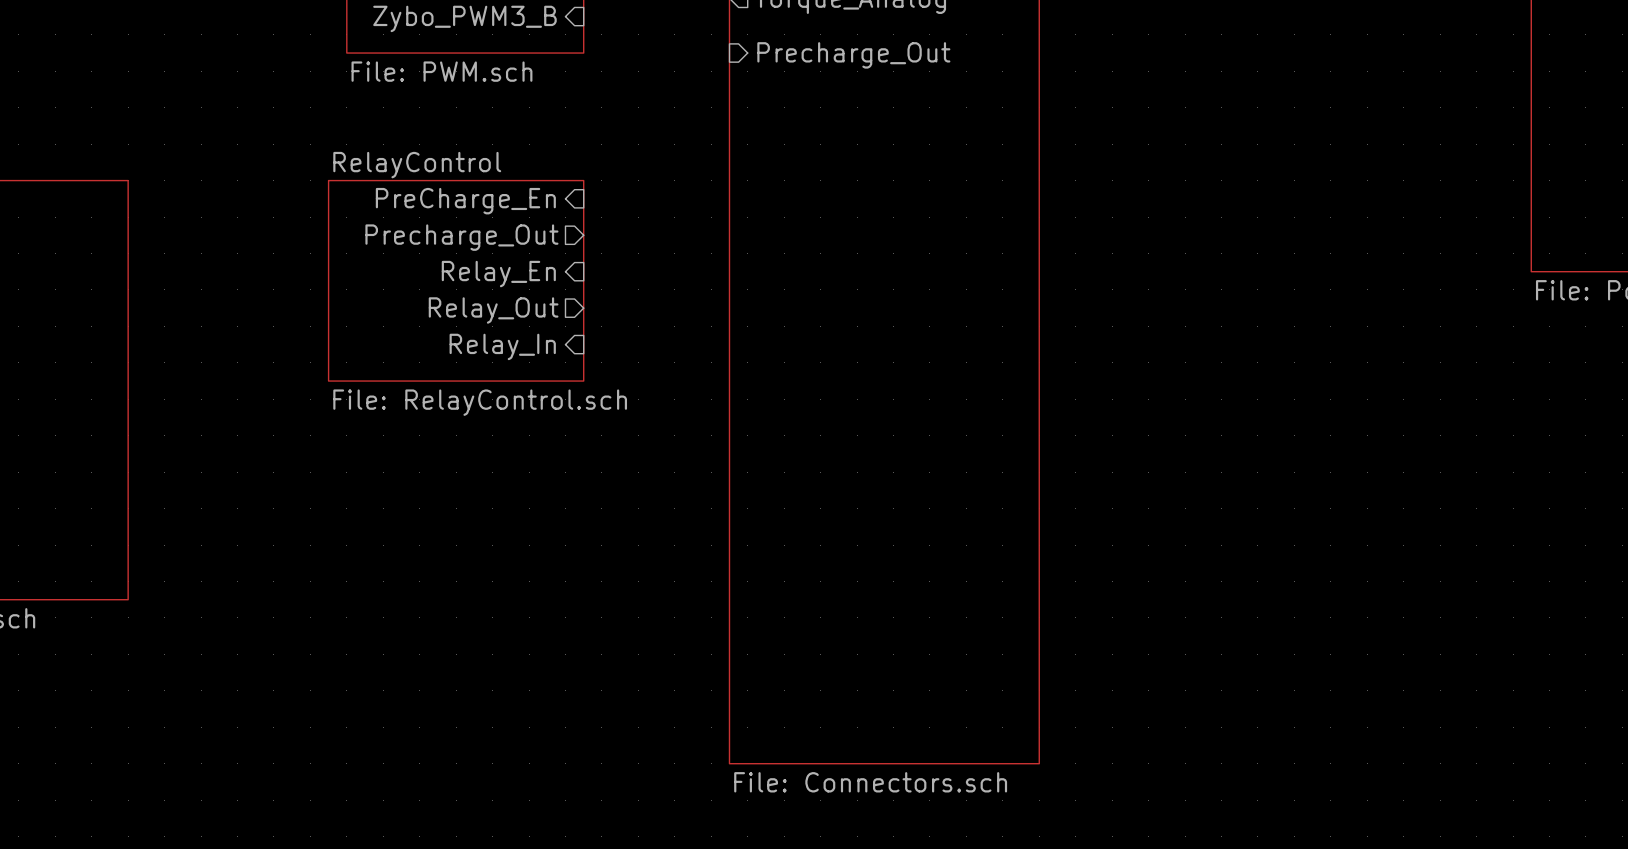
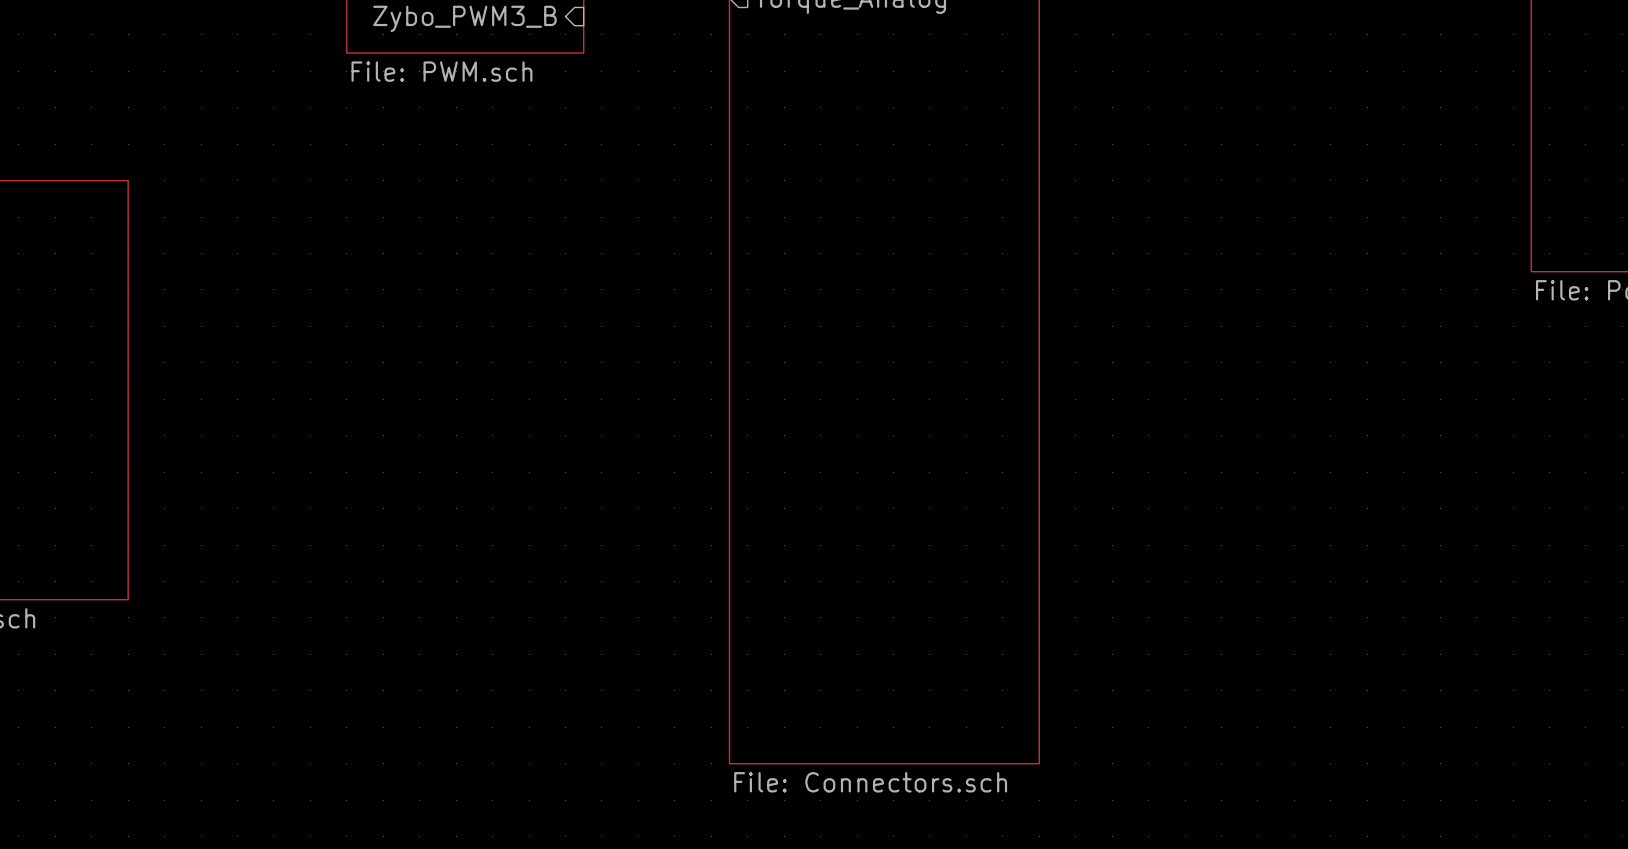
sheet pin: Precharge_Out (853, 55) -> none
sheet pin: PreCharge_En (465, 201) -> none
sheet pin: Precharge_Out (461, 237) -> none
sheet pin: Relay_En (498, 274) -> none
sheet RelayControl: File: RelayControl.sch (456, 280) -> none
sheet pin: Relay_Out (493, 310) -> none
sheet pin: Relay_In (502, 346) -> none

